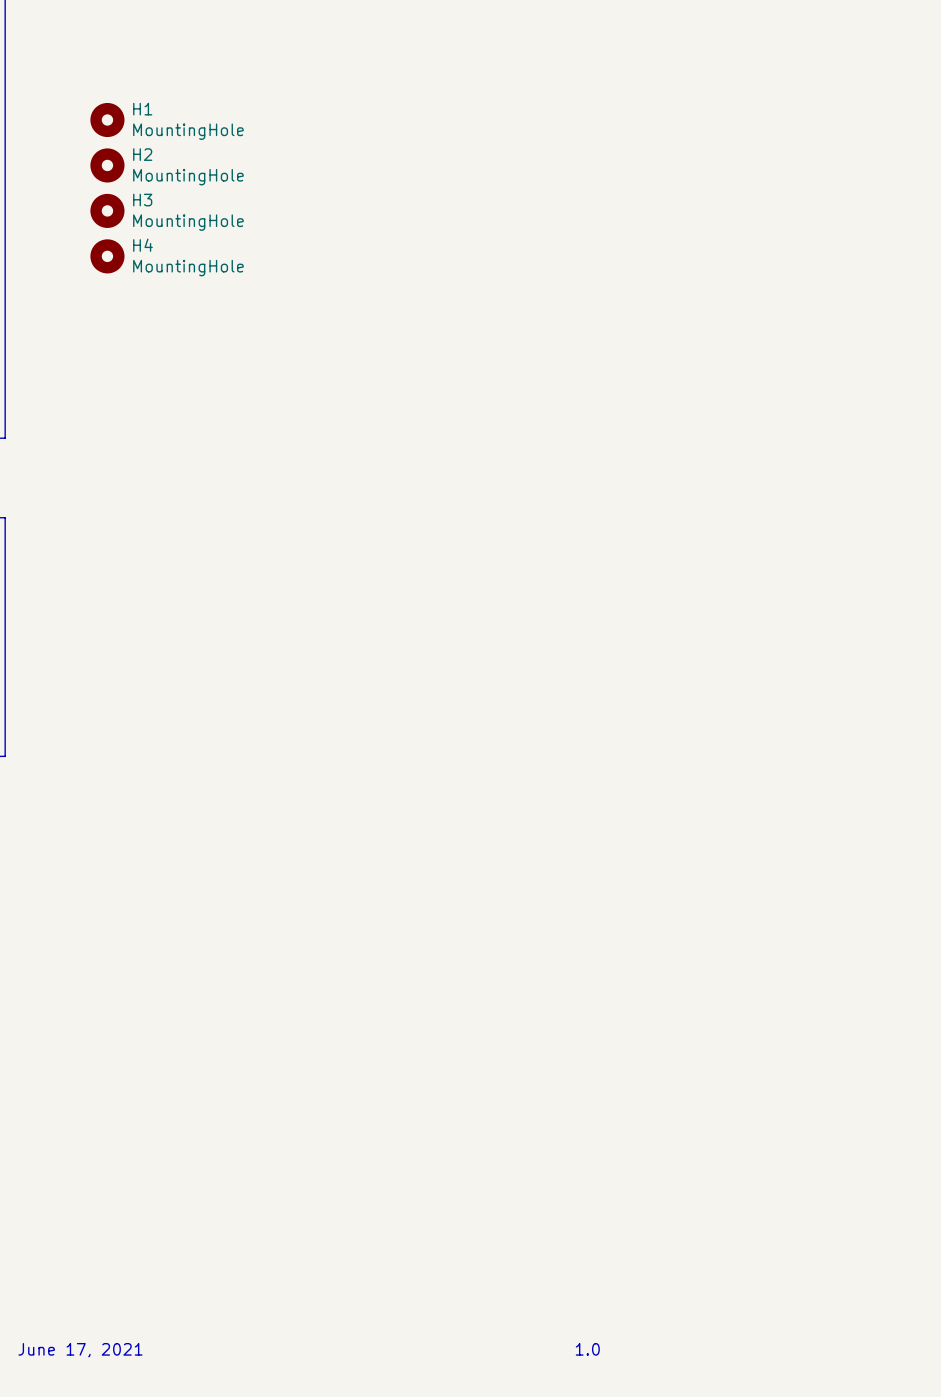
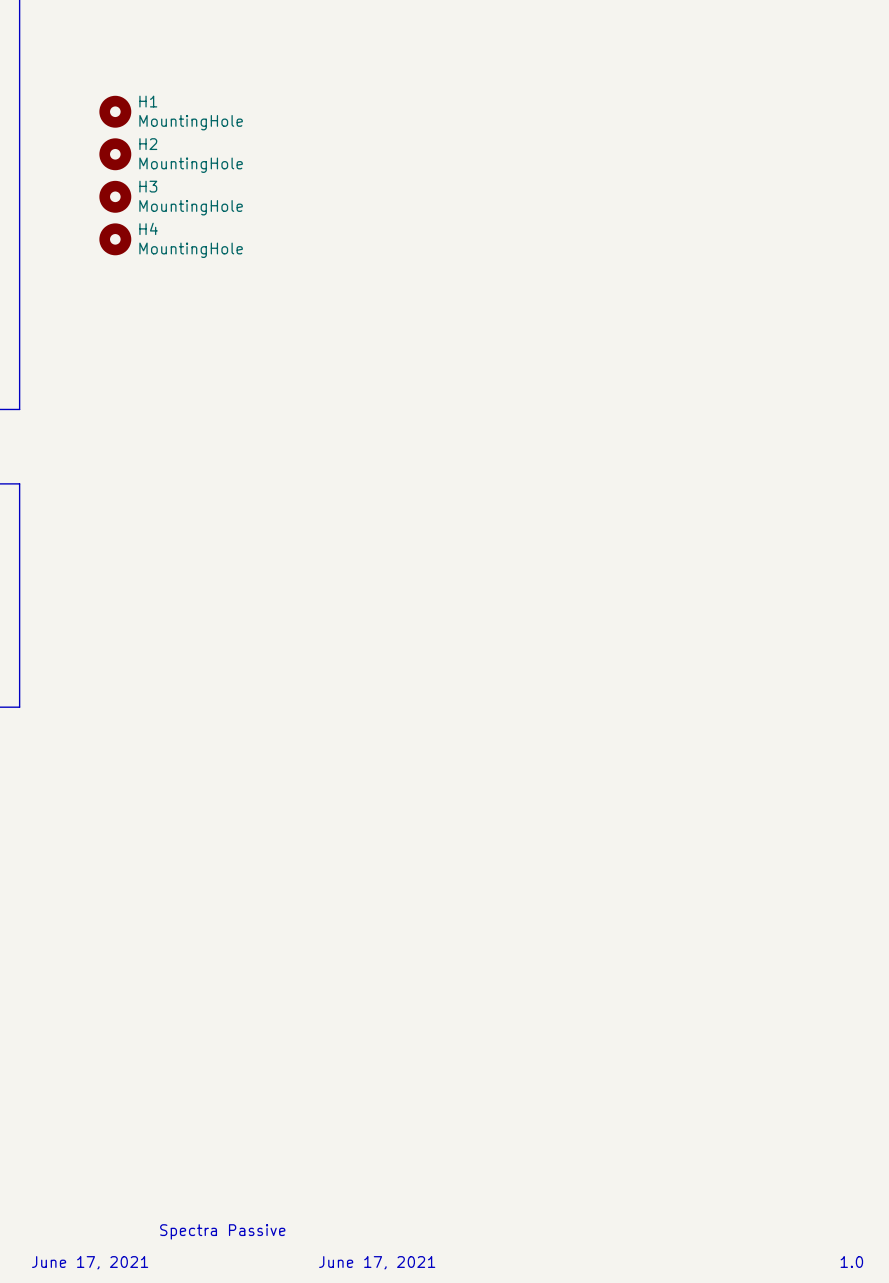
text: none -> Spectra Passive (222, 1231)
text: 1.0 (587, 1349) -> none
text: none -> 1.0 (851, 1262)
text: none -> June 17, 2021 (377, 1262)

